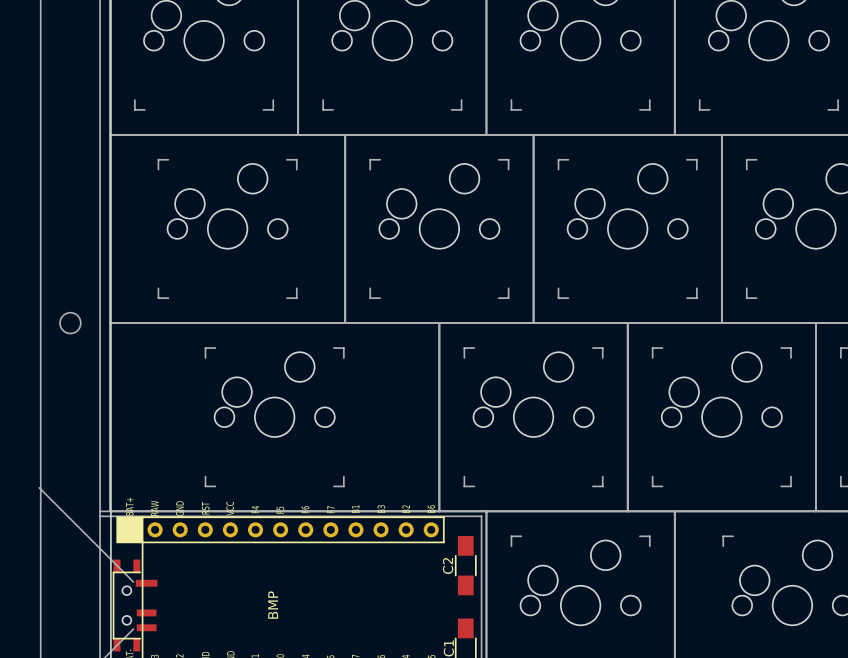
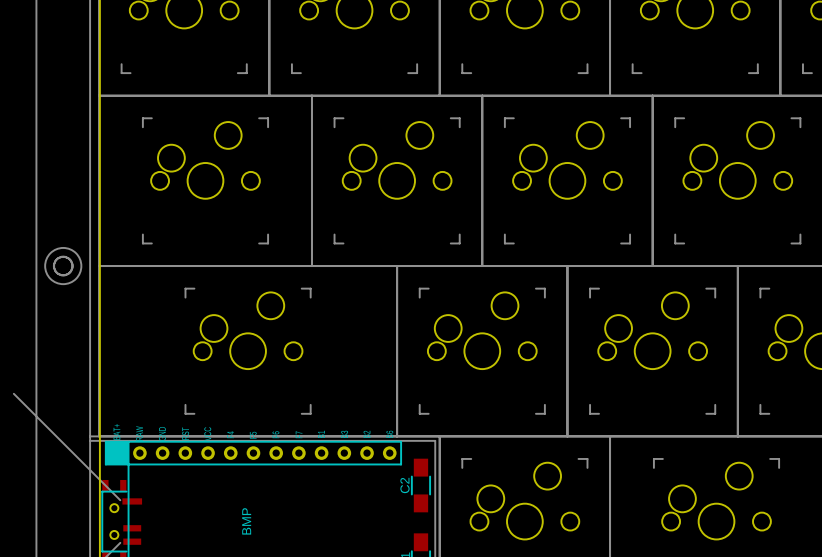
drawing: none -> [44, 247, 82, 285]
line: none -> (13, 393) (35, 415)

